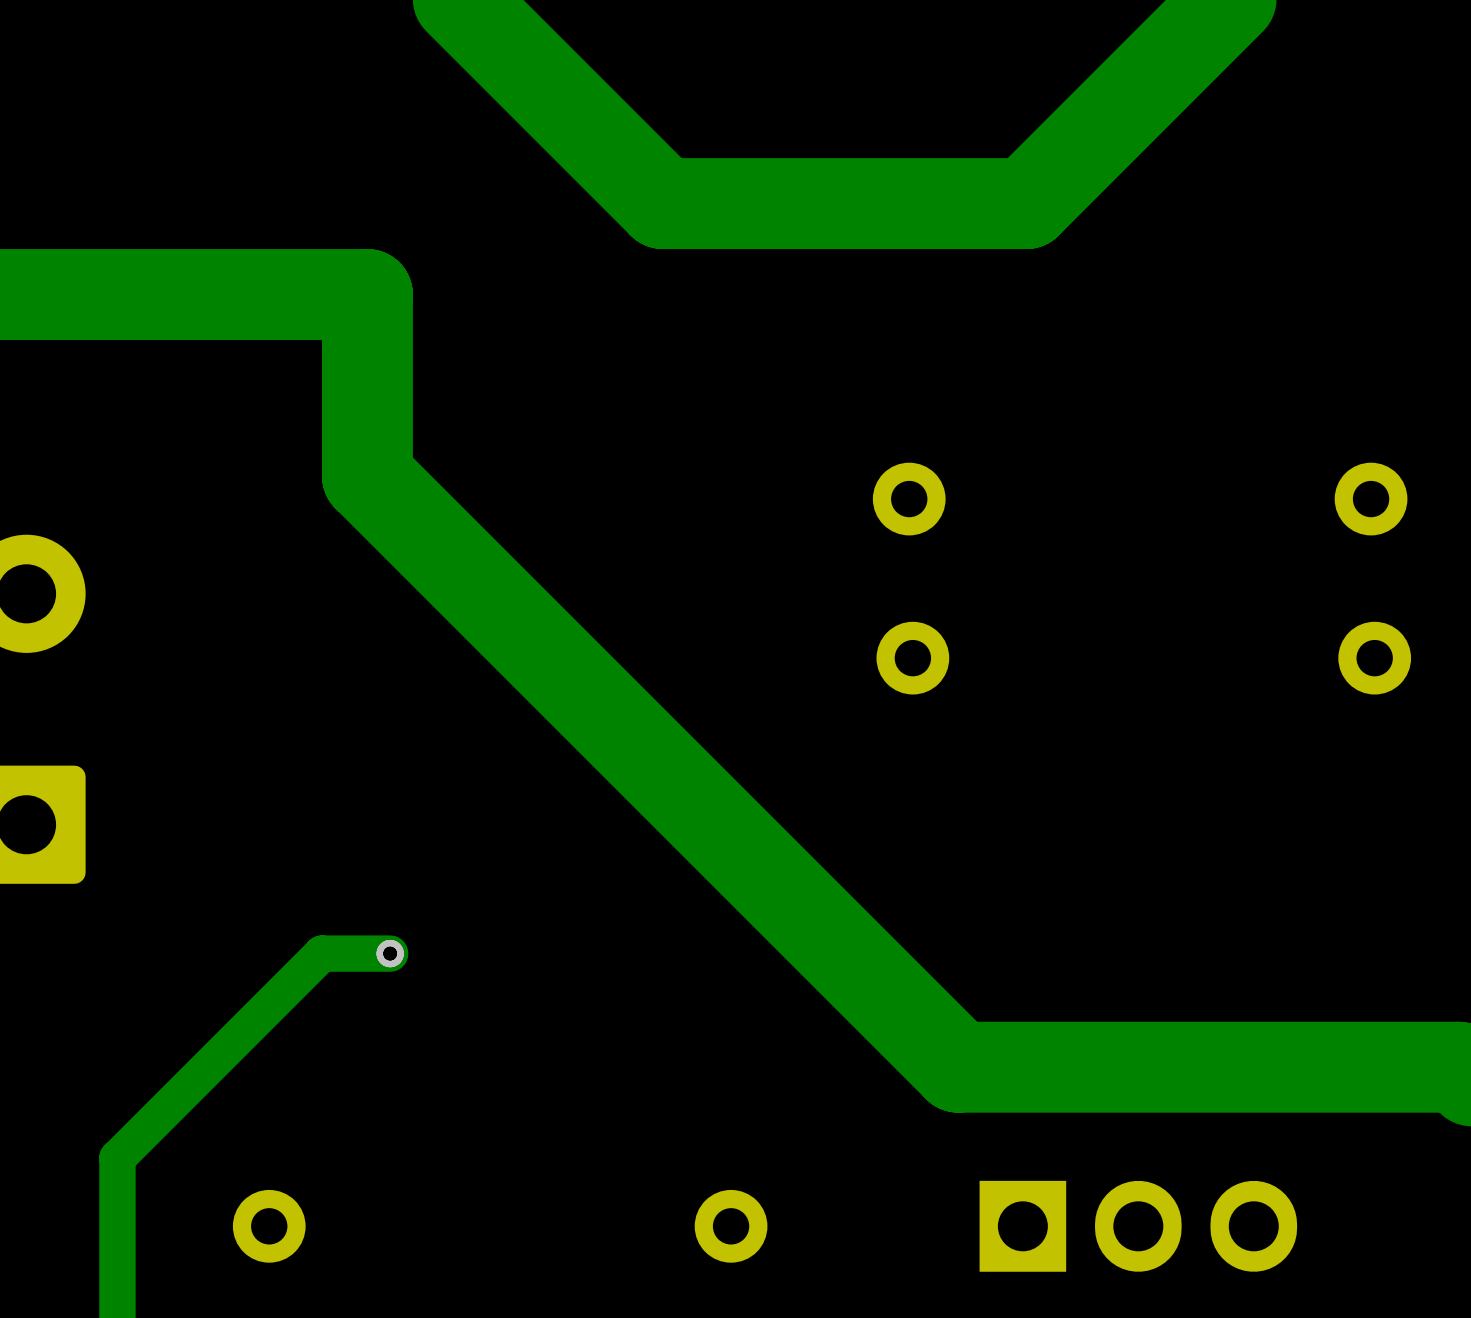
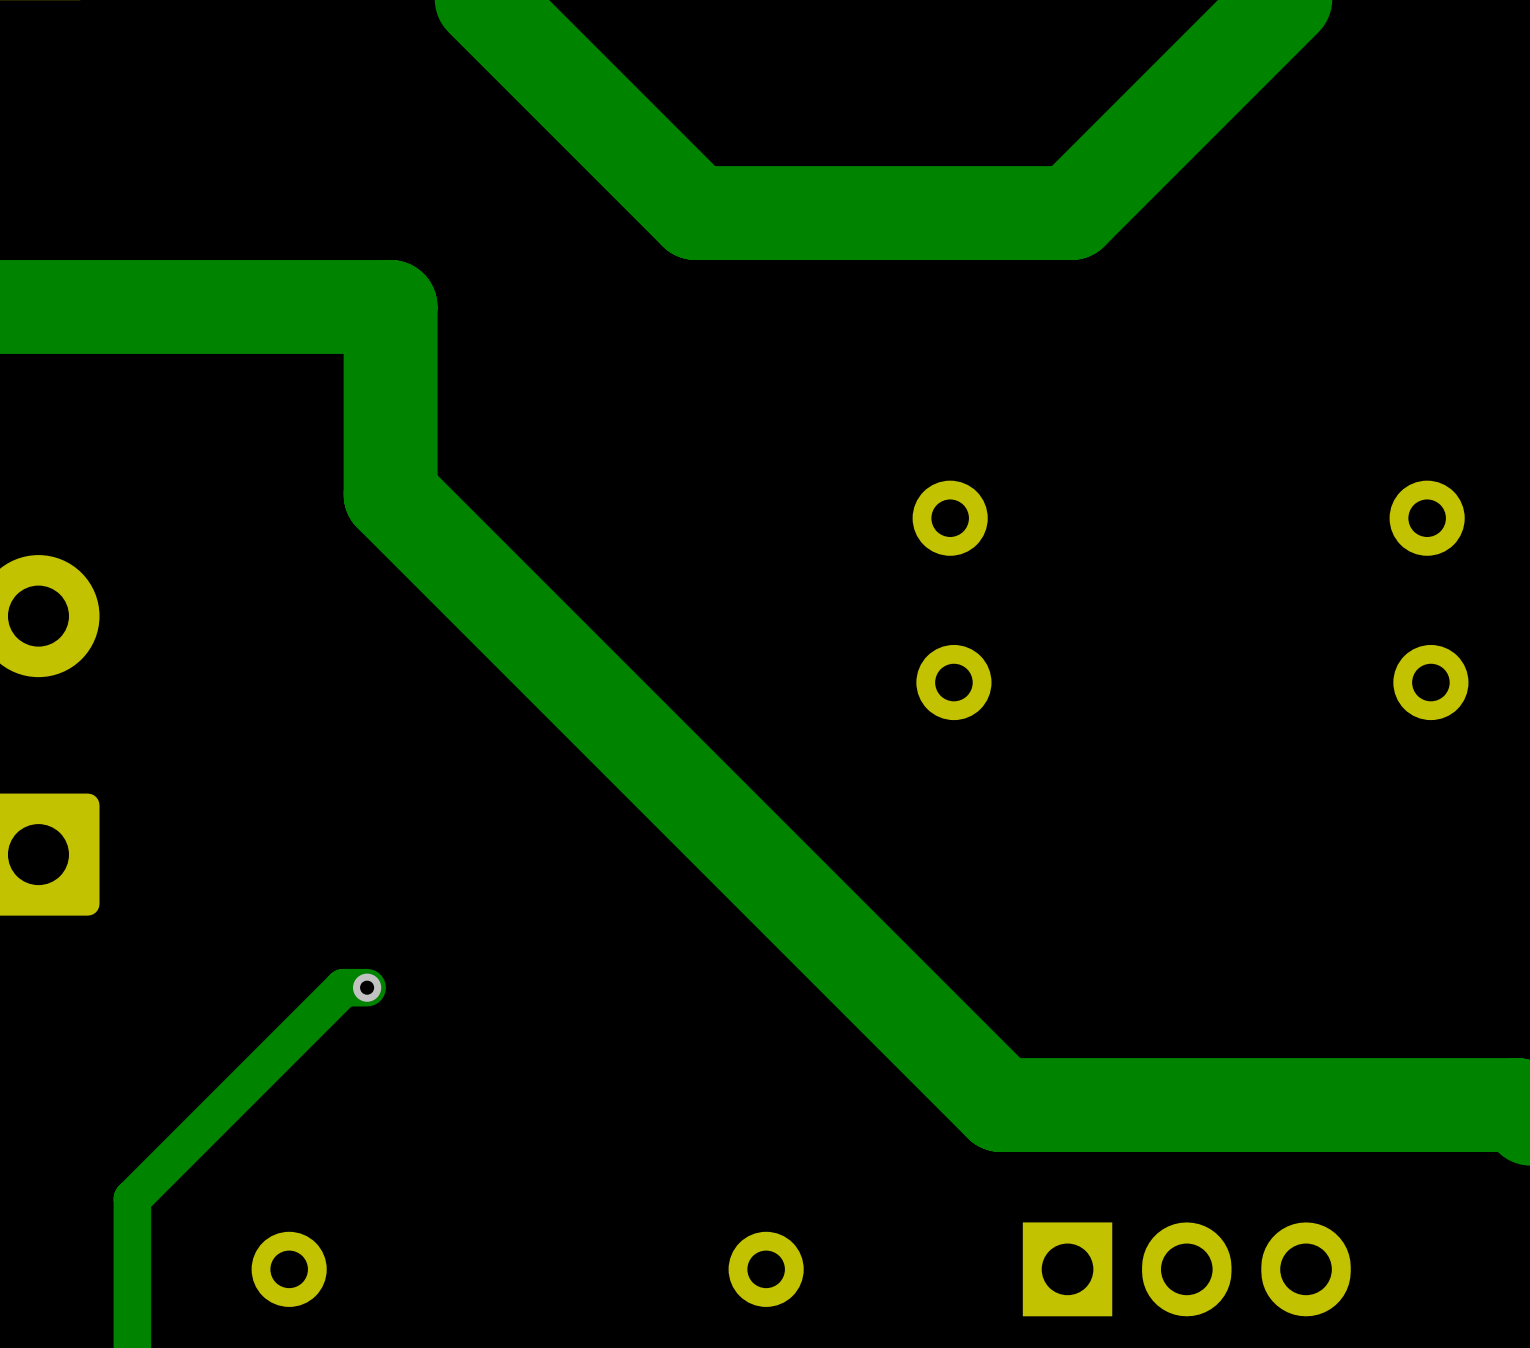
track: (390, 953) (344, 953) -> none
via position: (390, 953) -> (367, 987)

